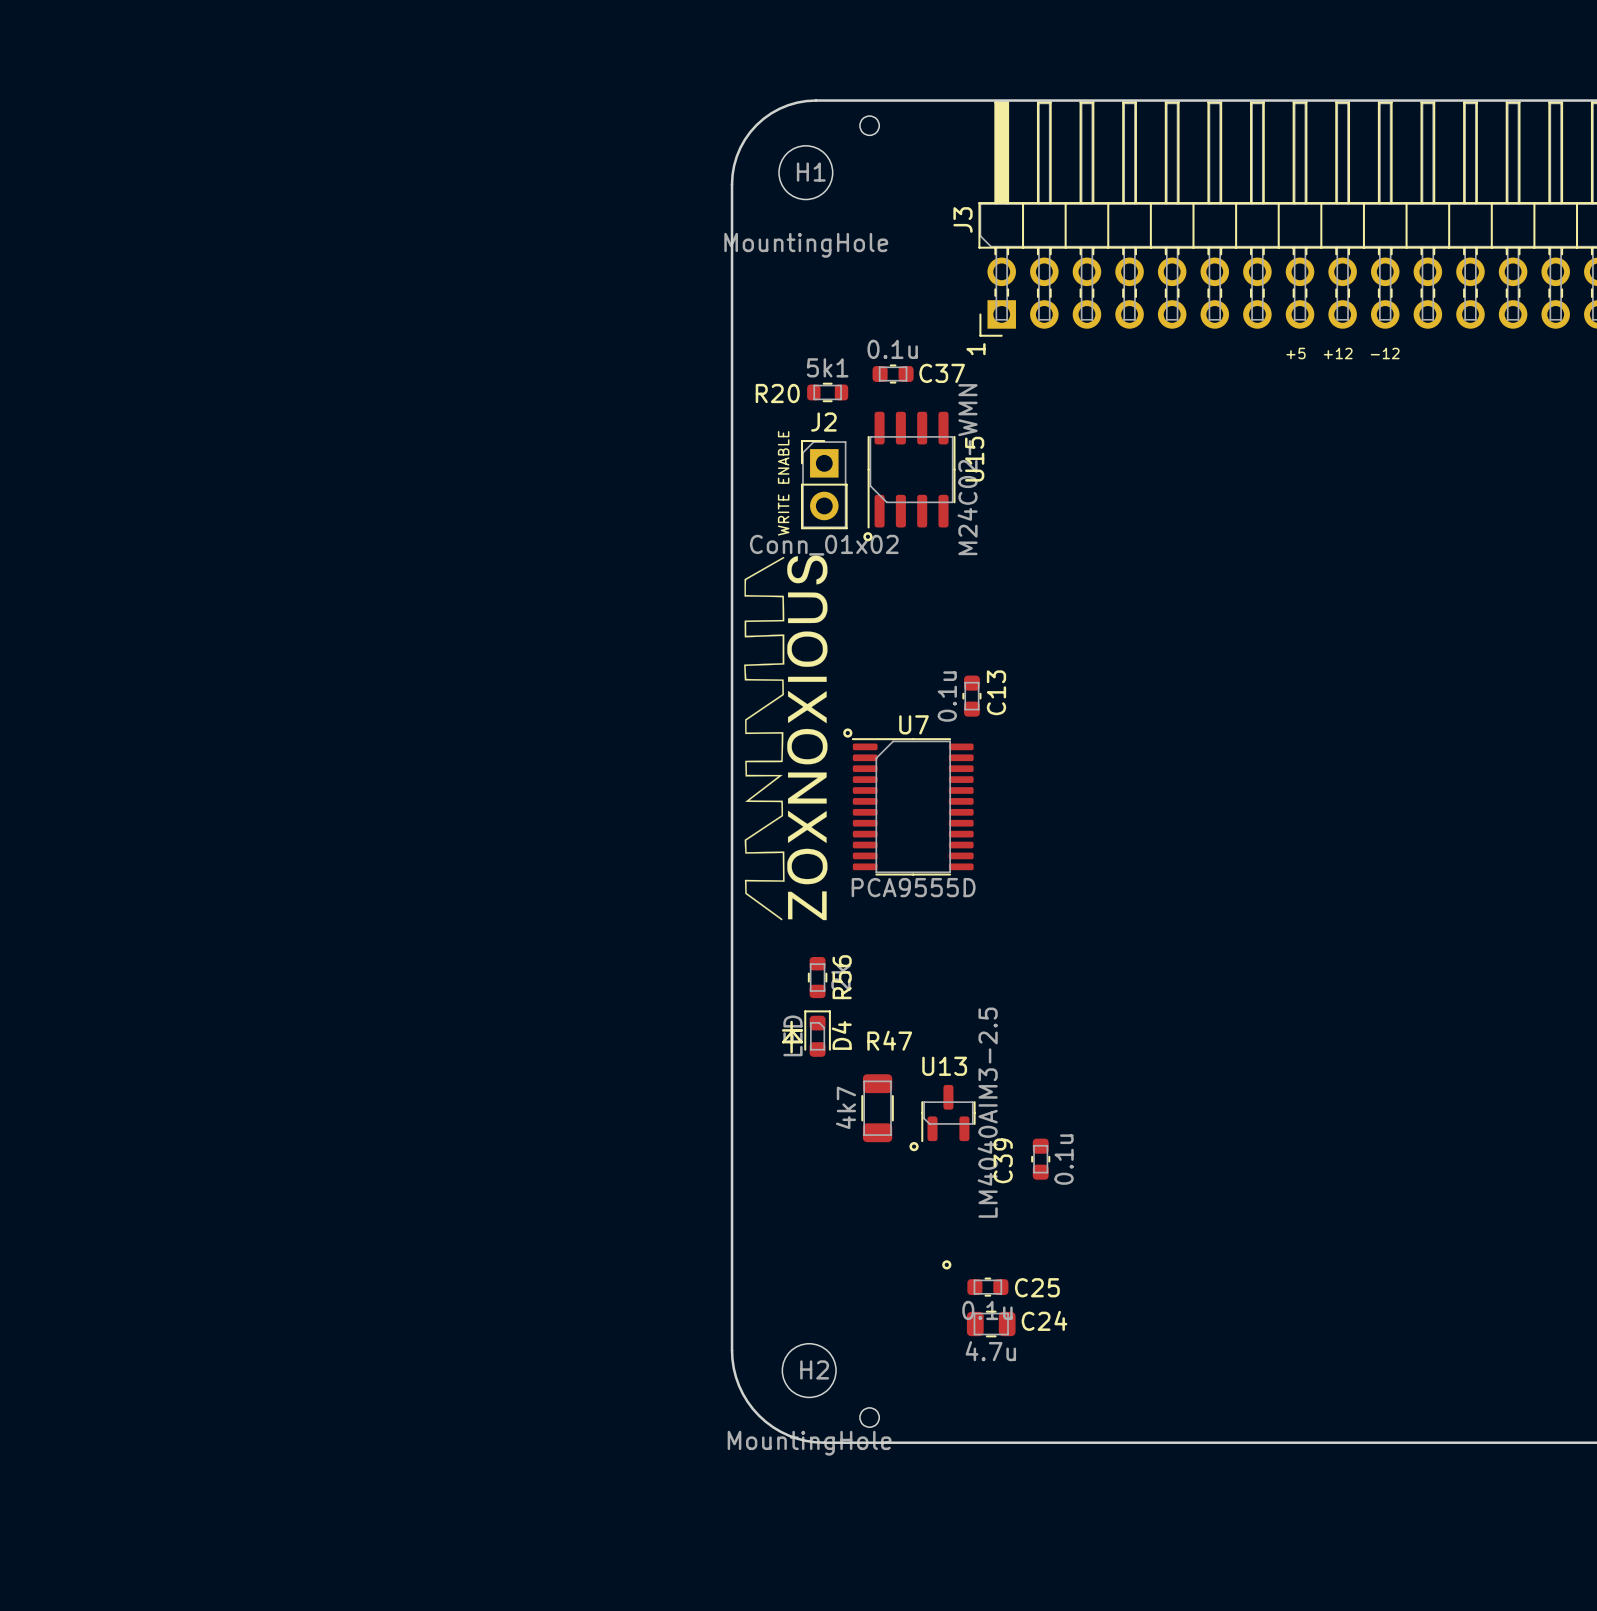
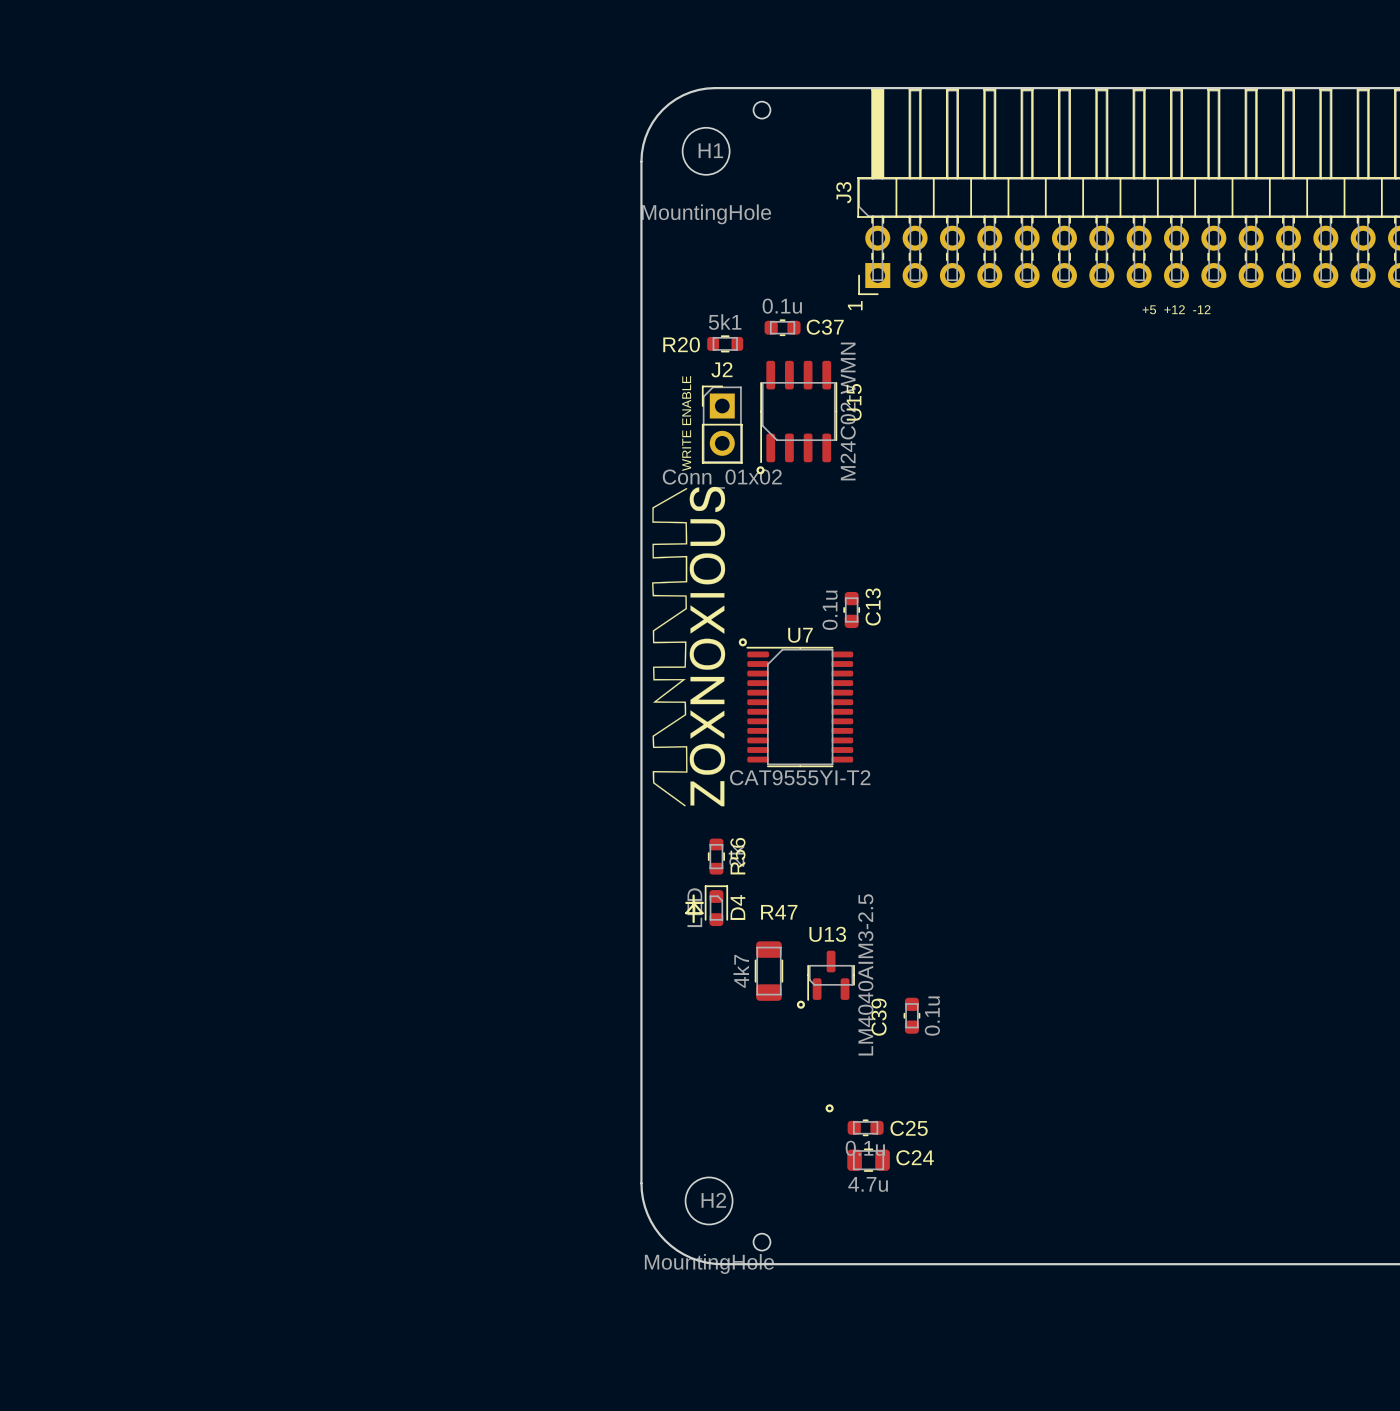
U7 value: PCA9555D (913, 887) -> CAT9555YI-T2 (800, 777)

